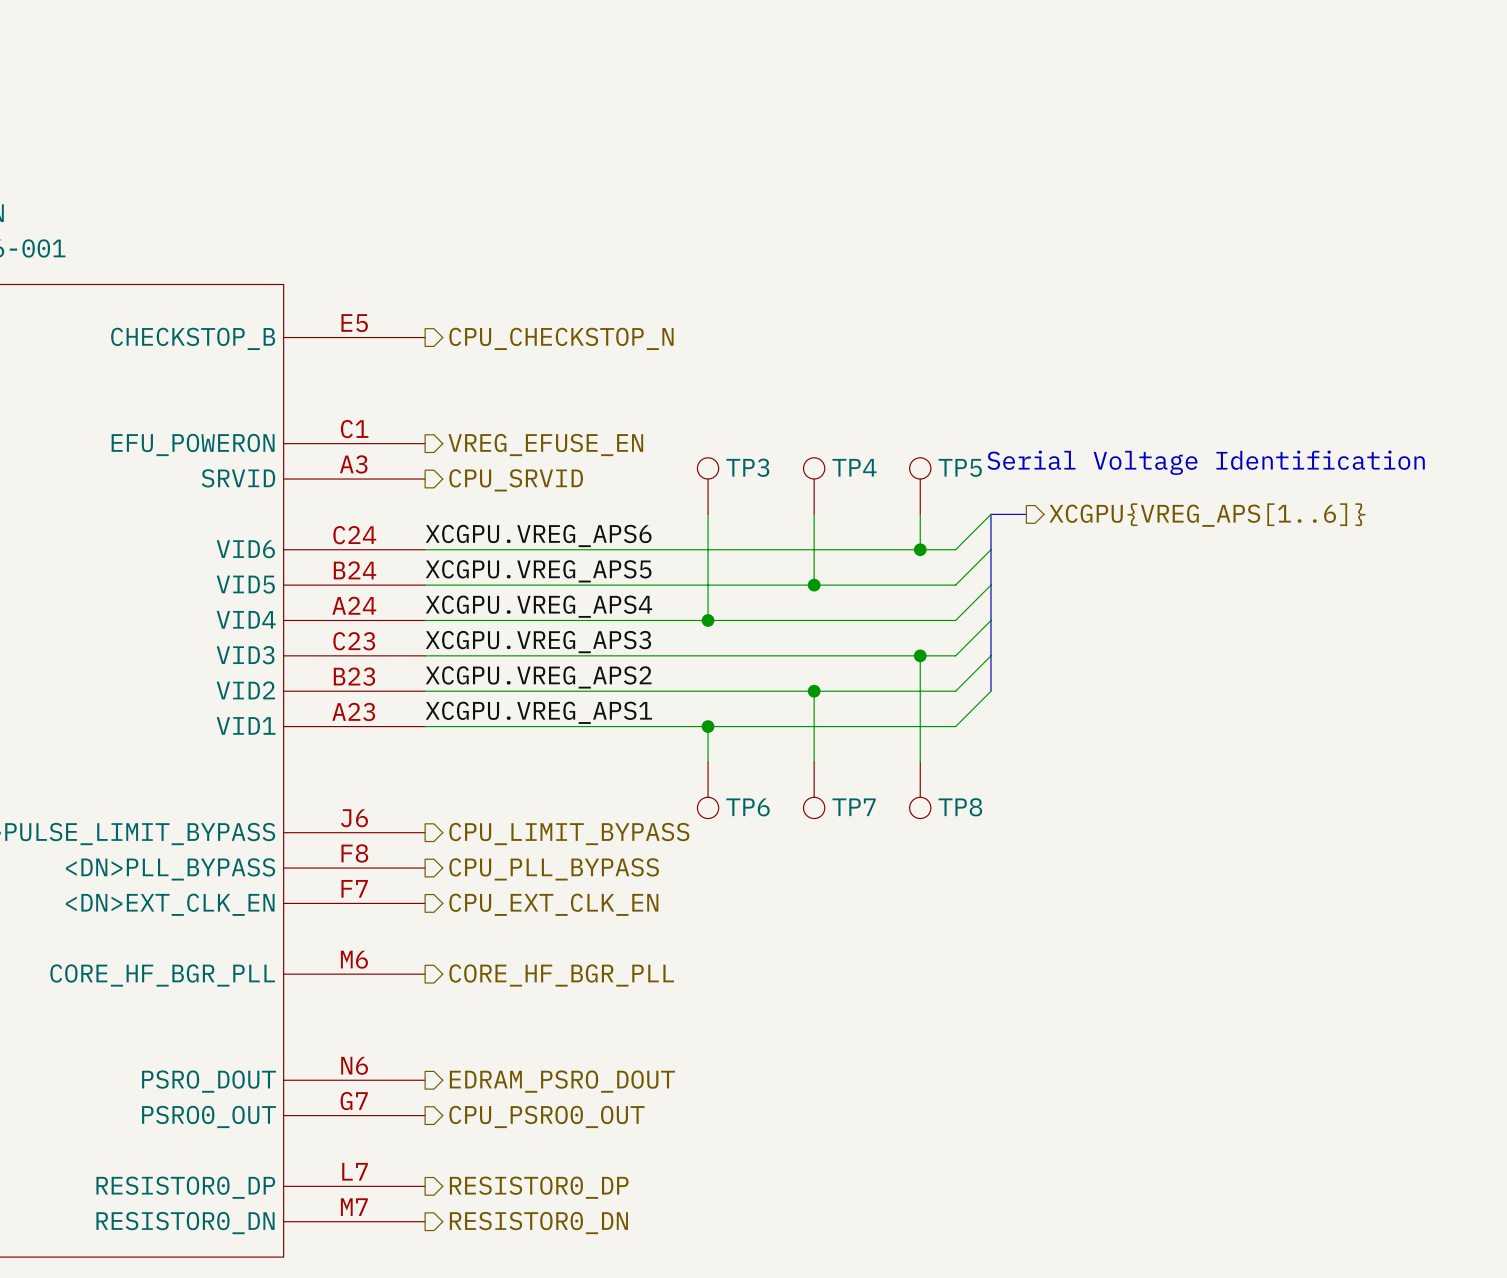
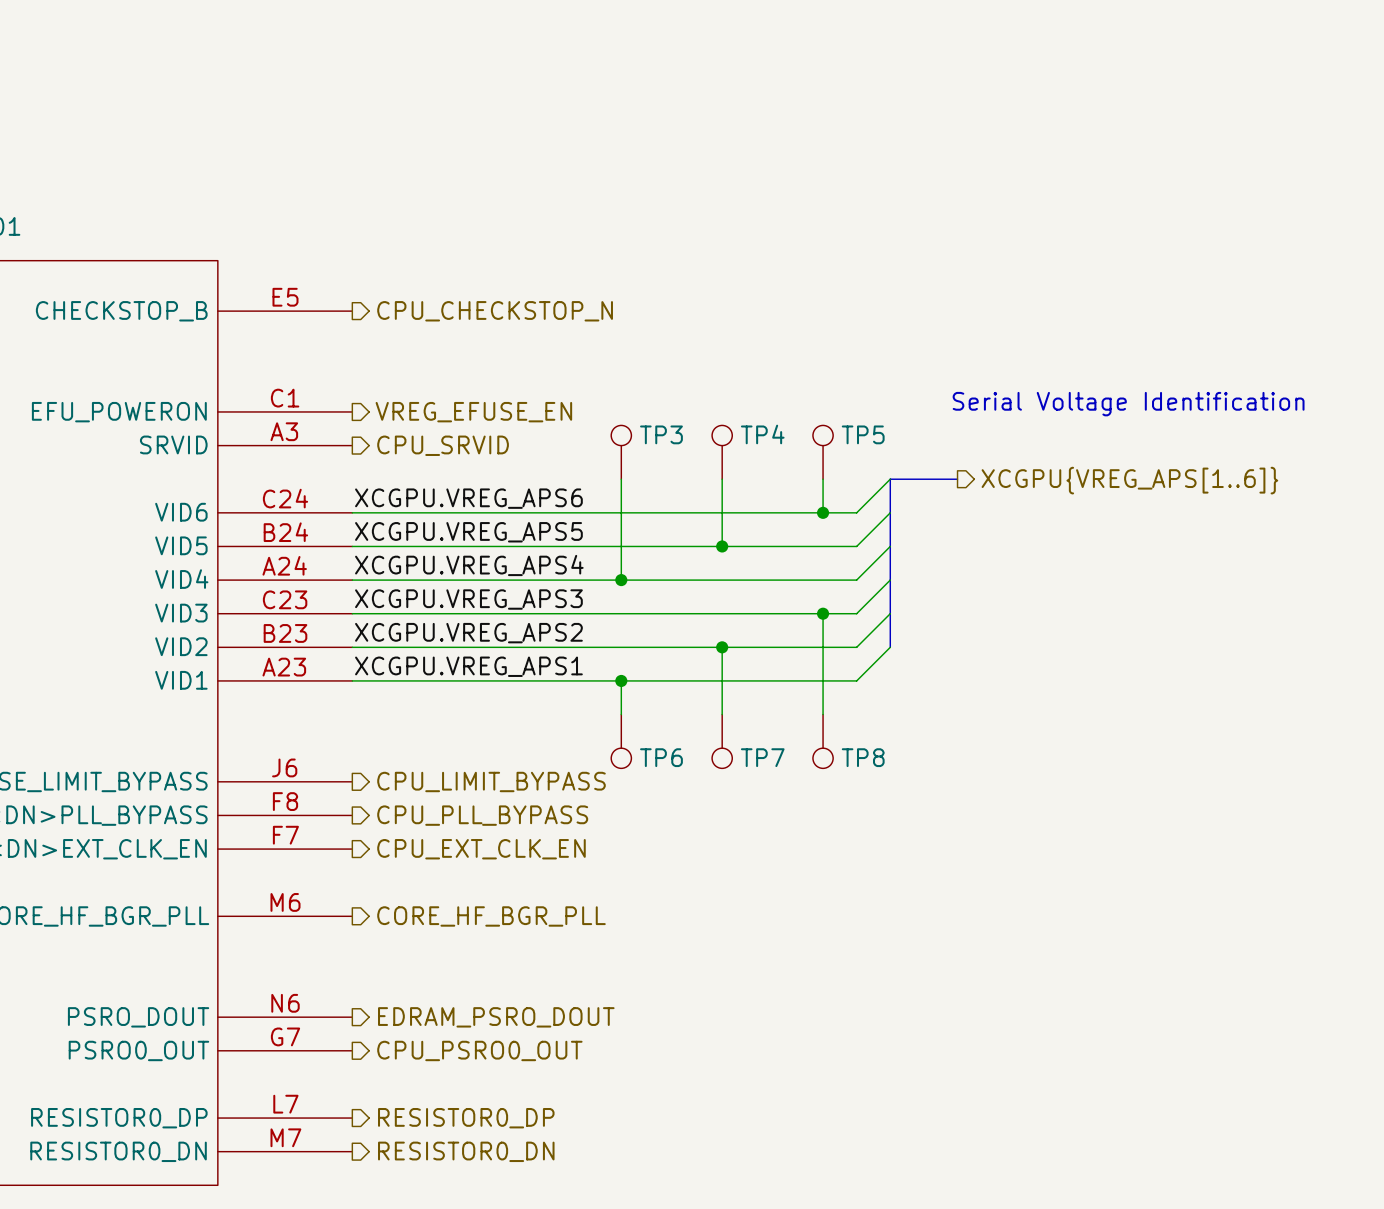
text position: Serial Voltage Identification (1206, 462) -> Serial Voltage Identification (1128, 404)
bus: none -> (923, 479) (957, 479)
hierarchical label position: XCGPU{VREG_APS[1..6]} (1207, 515) -> XCGPU{VREG_APS[1..6]} (1129, 480)

